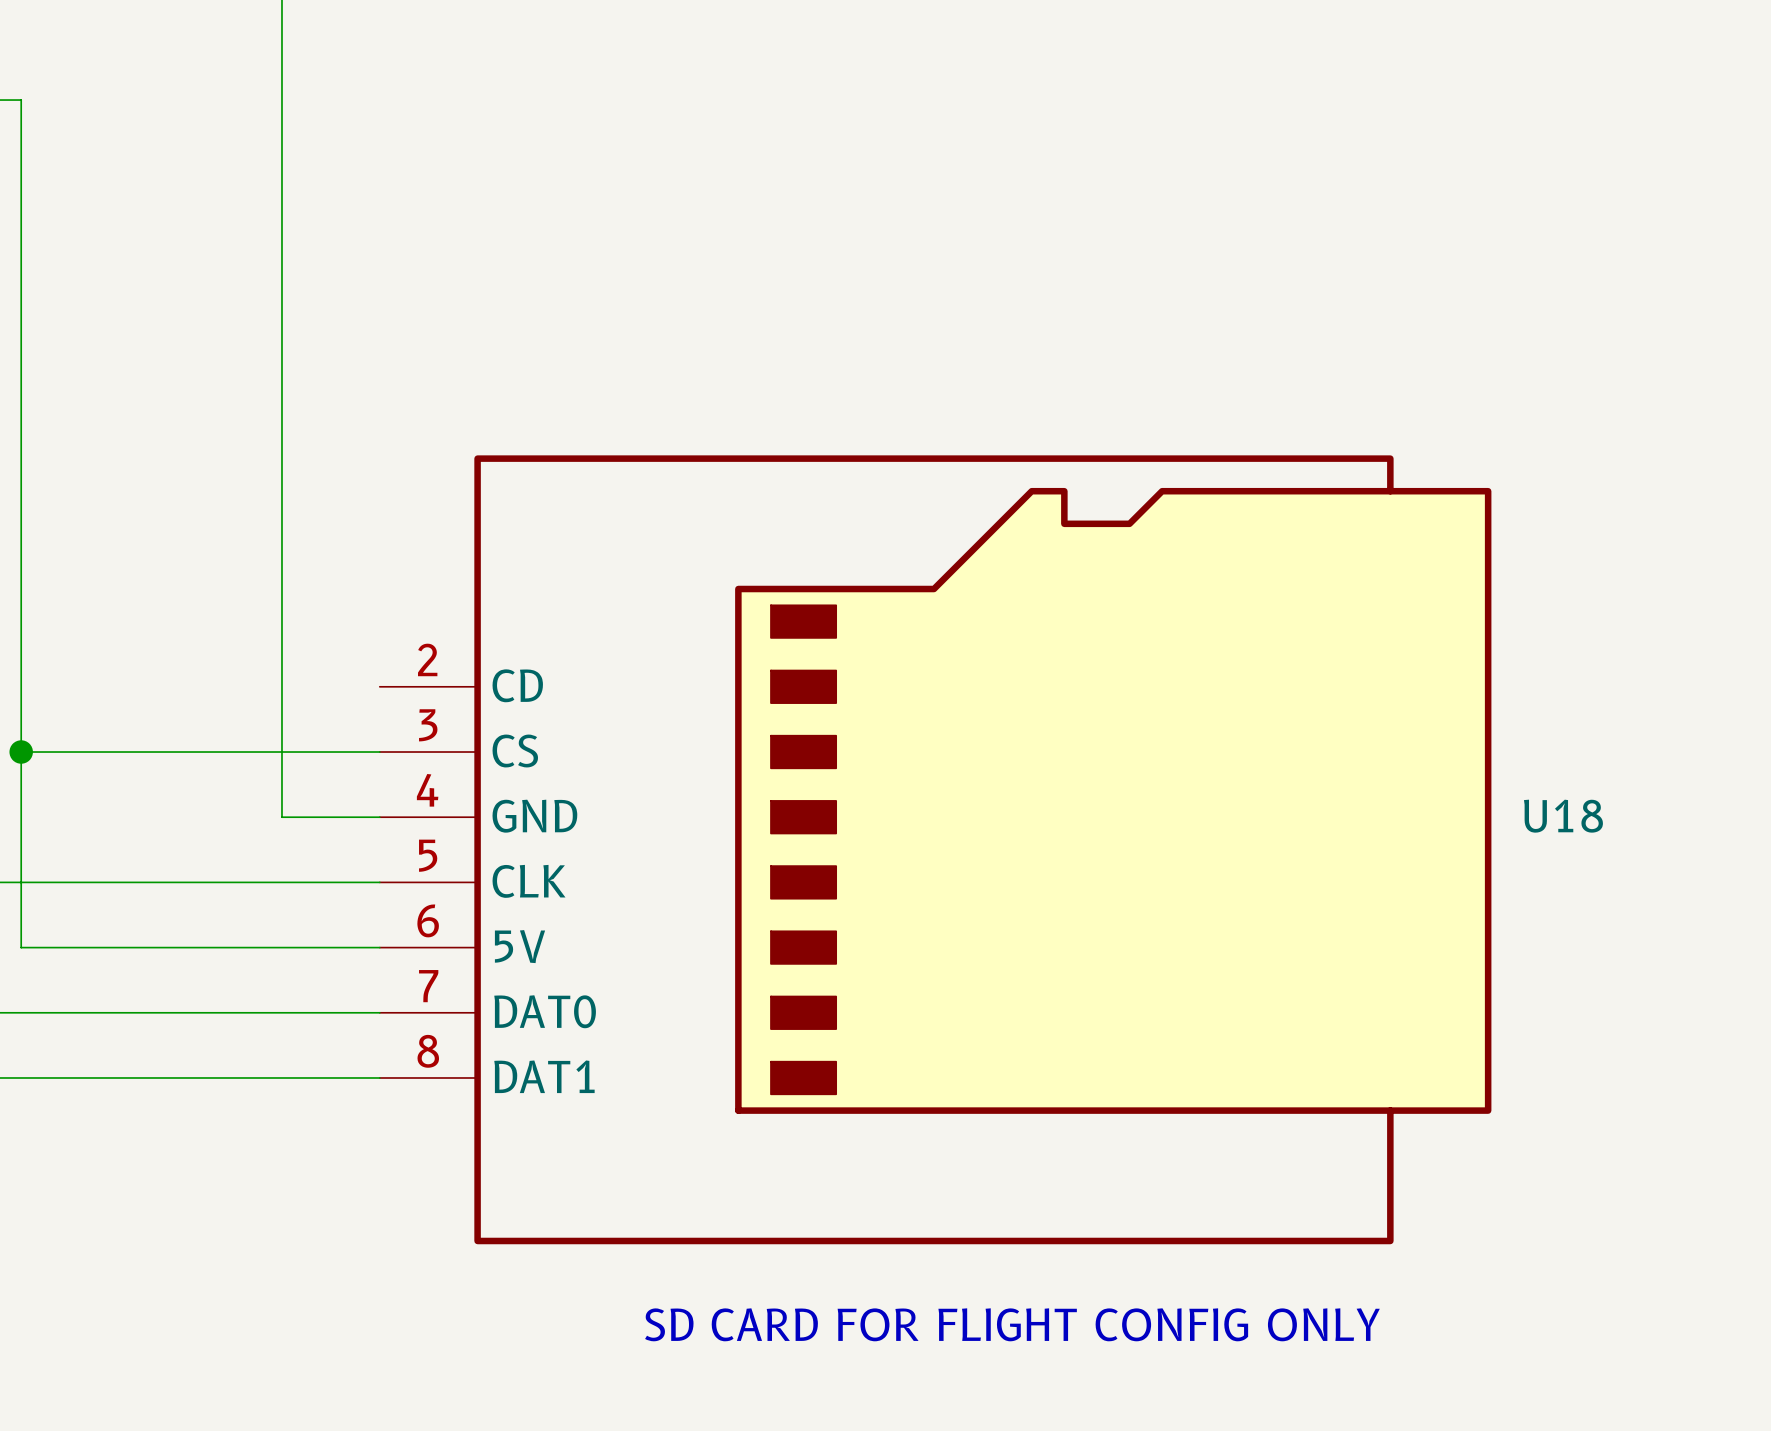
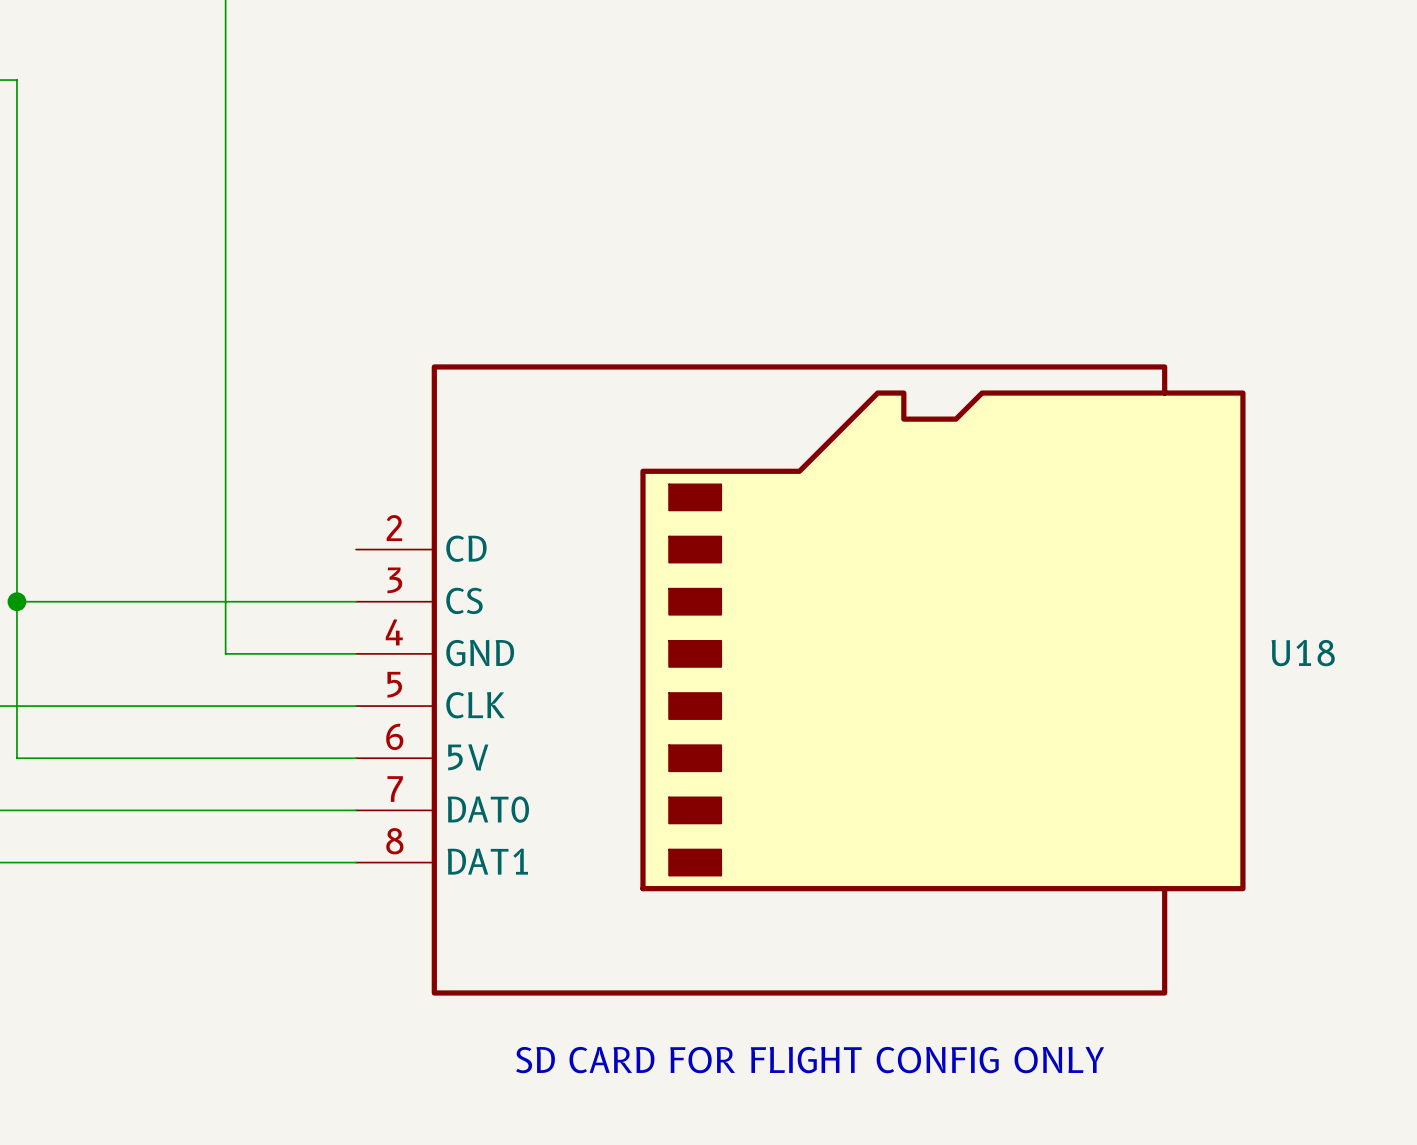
U18 position: (935, 849) -> (800, 679)

